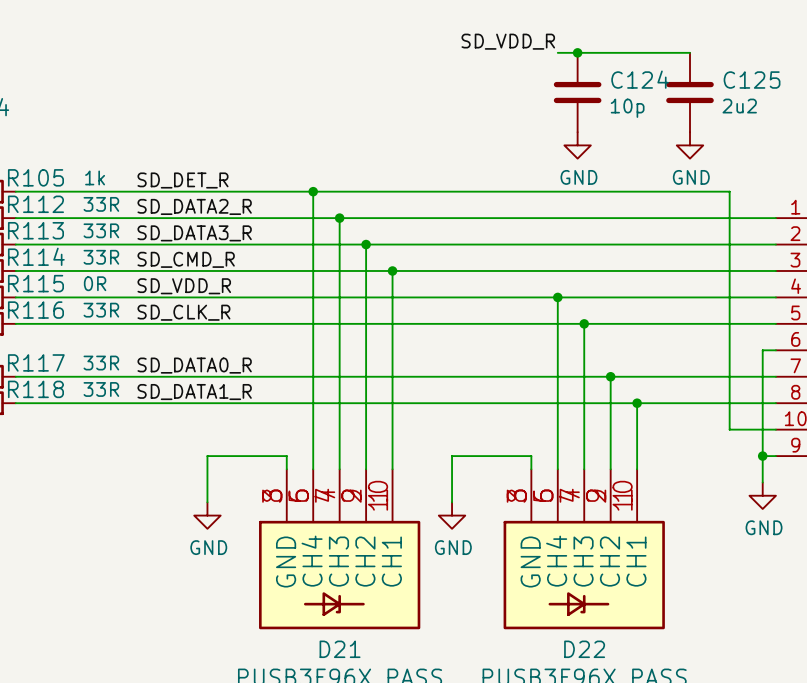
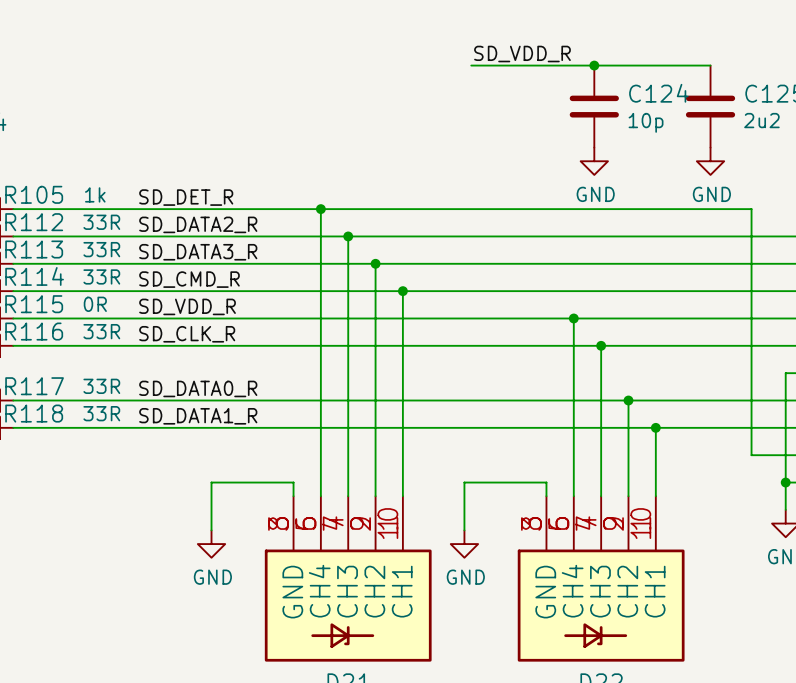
label position: SD_VDD_R (508, 41) -> SD_VDD_R (522, 54)
wire: none -> (471, 65) (573, 65)

